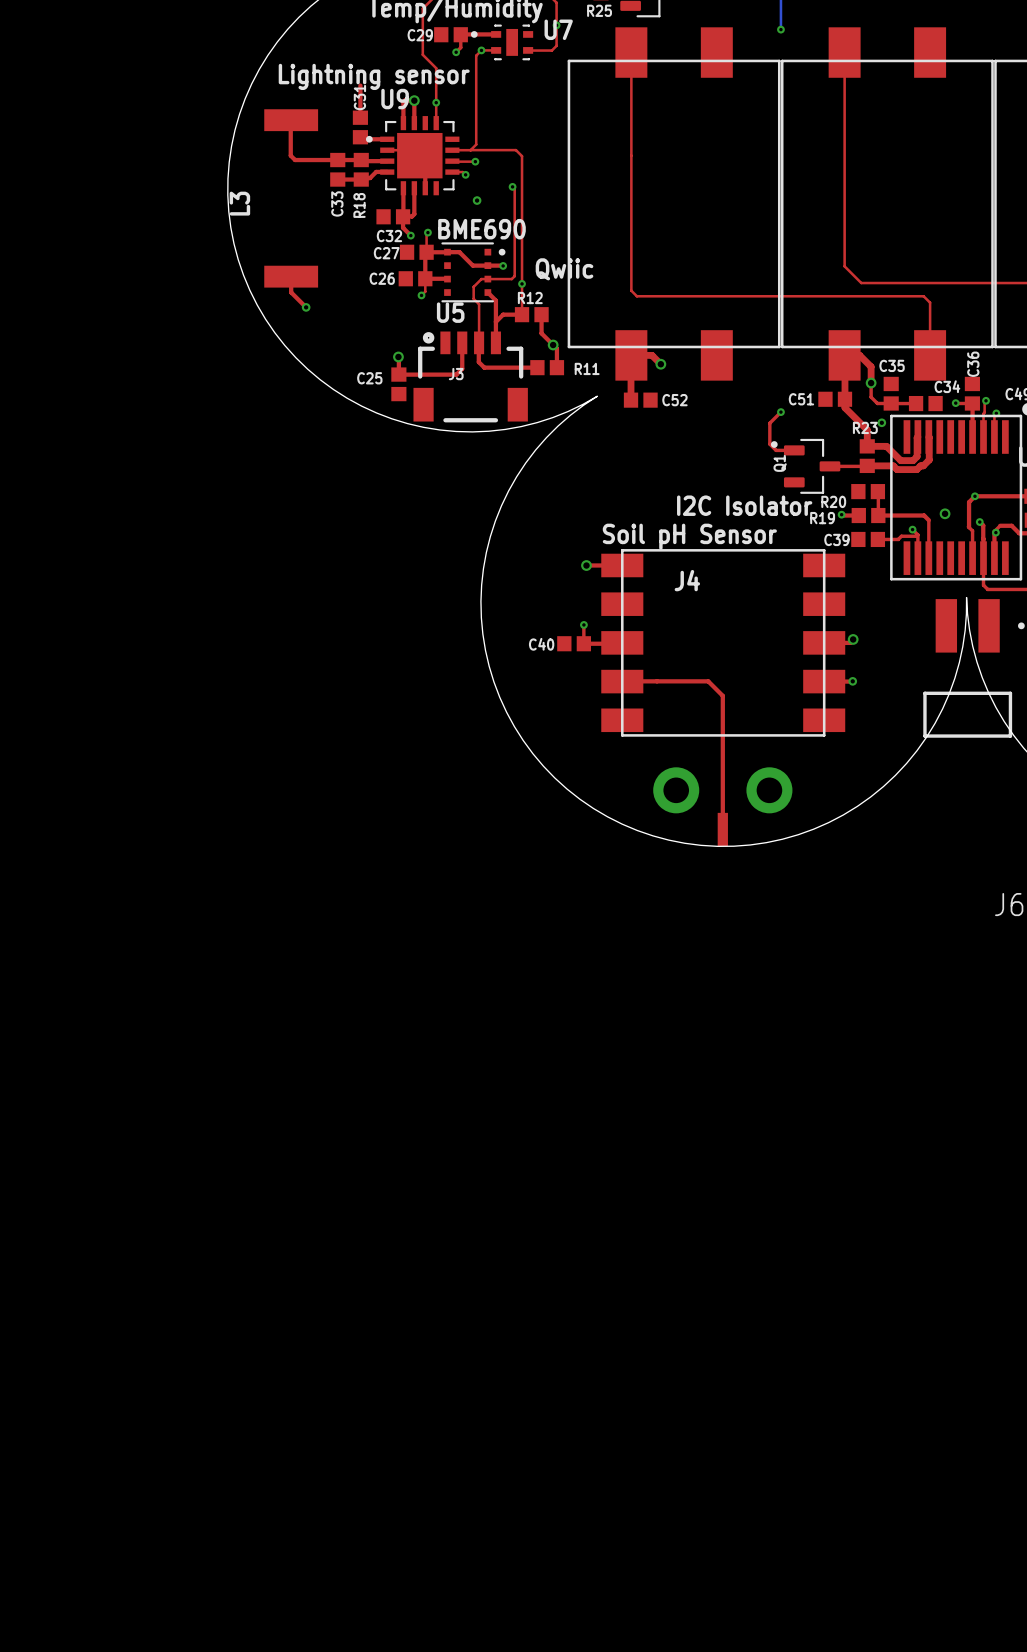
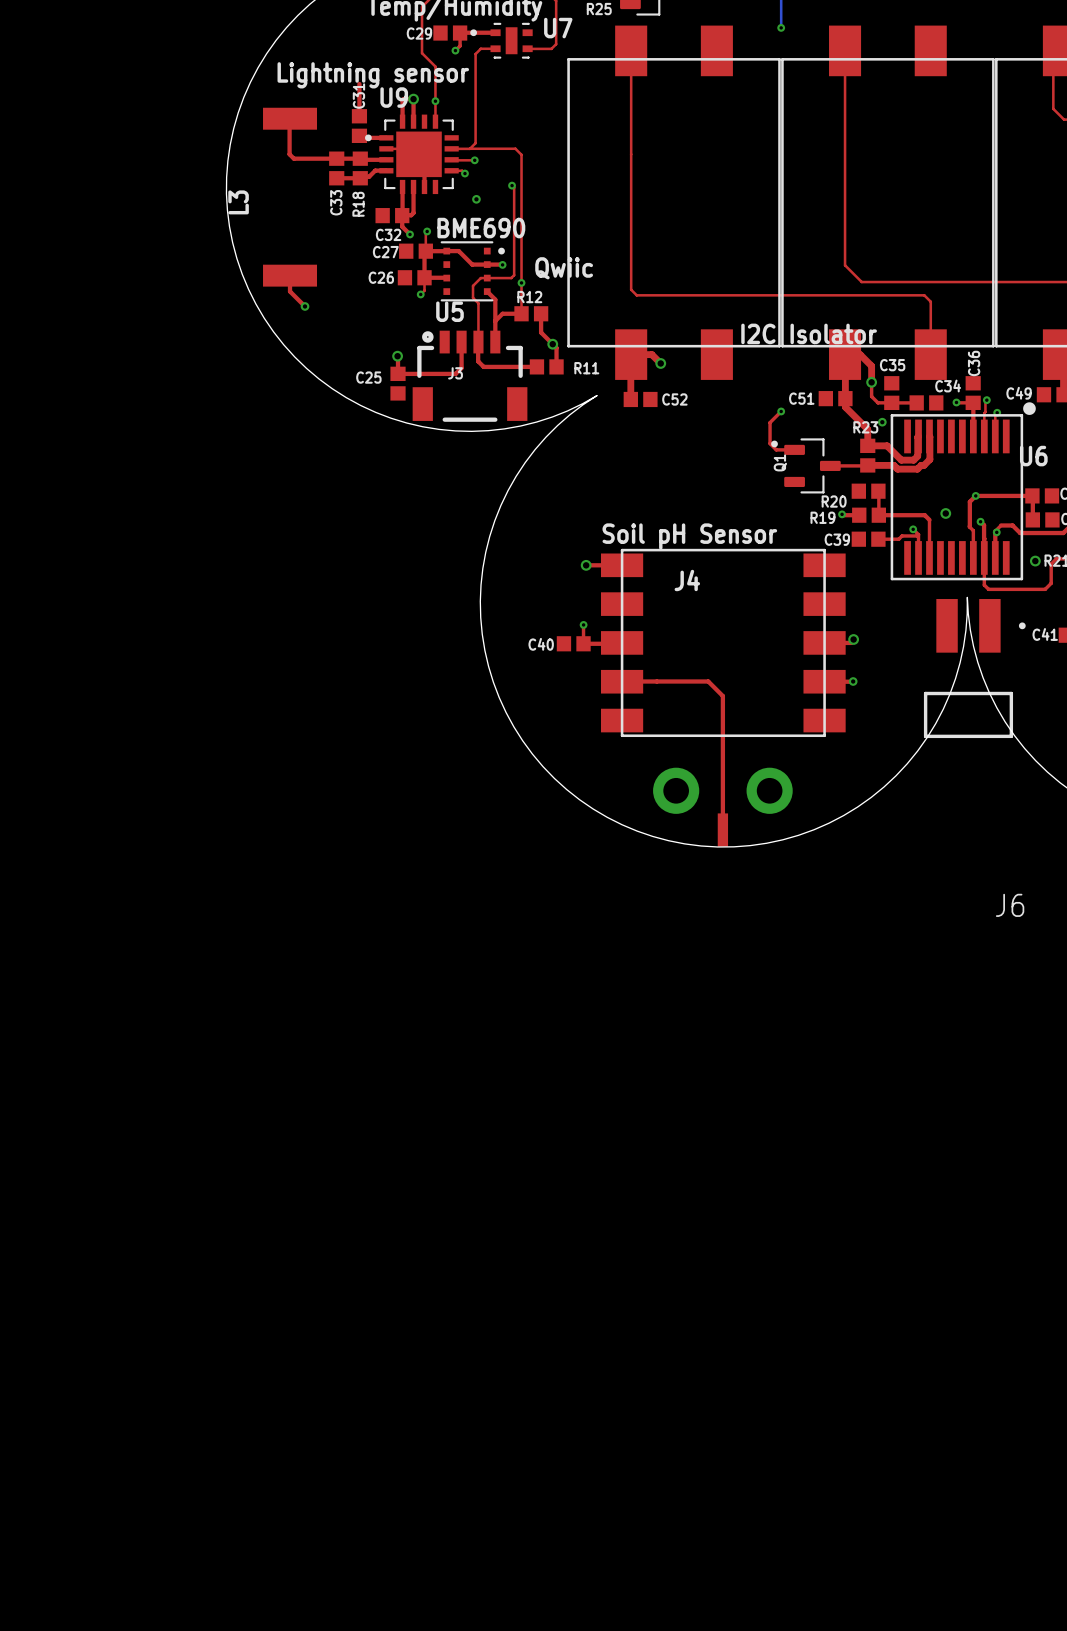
via: (556, 25) -> none
via: (481, 50) -> none
text position: I2C Isolator (744, 505) -> I2C Isolator (809, 333)

